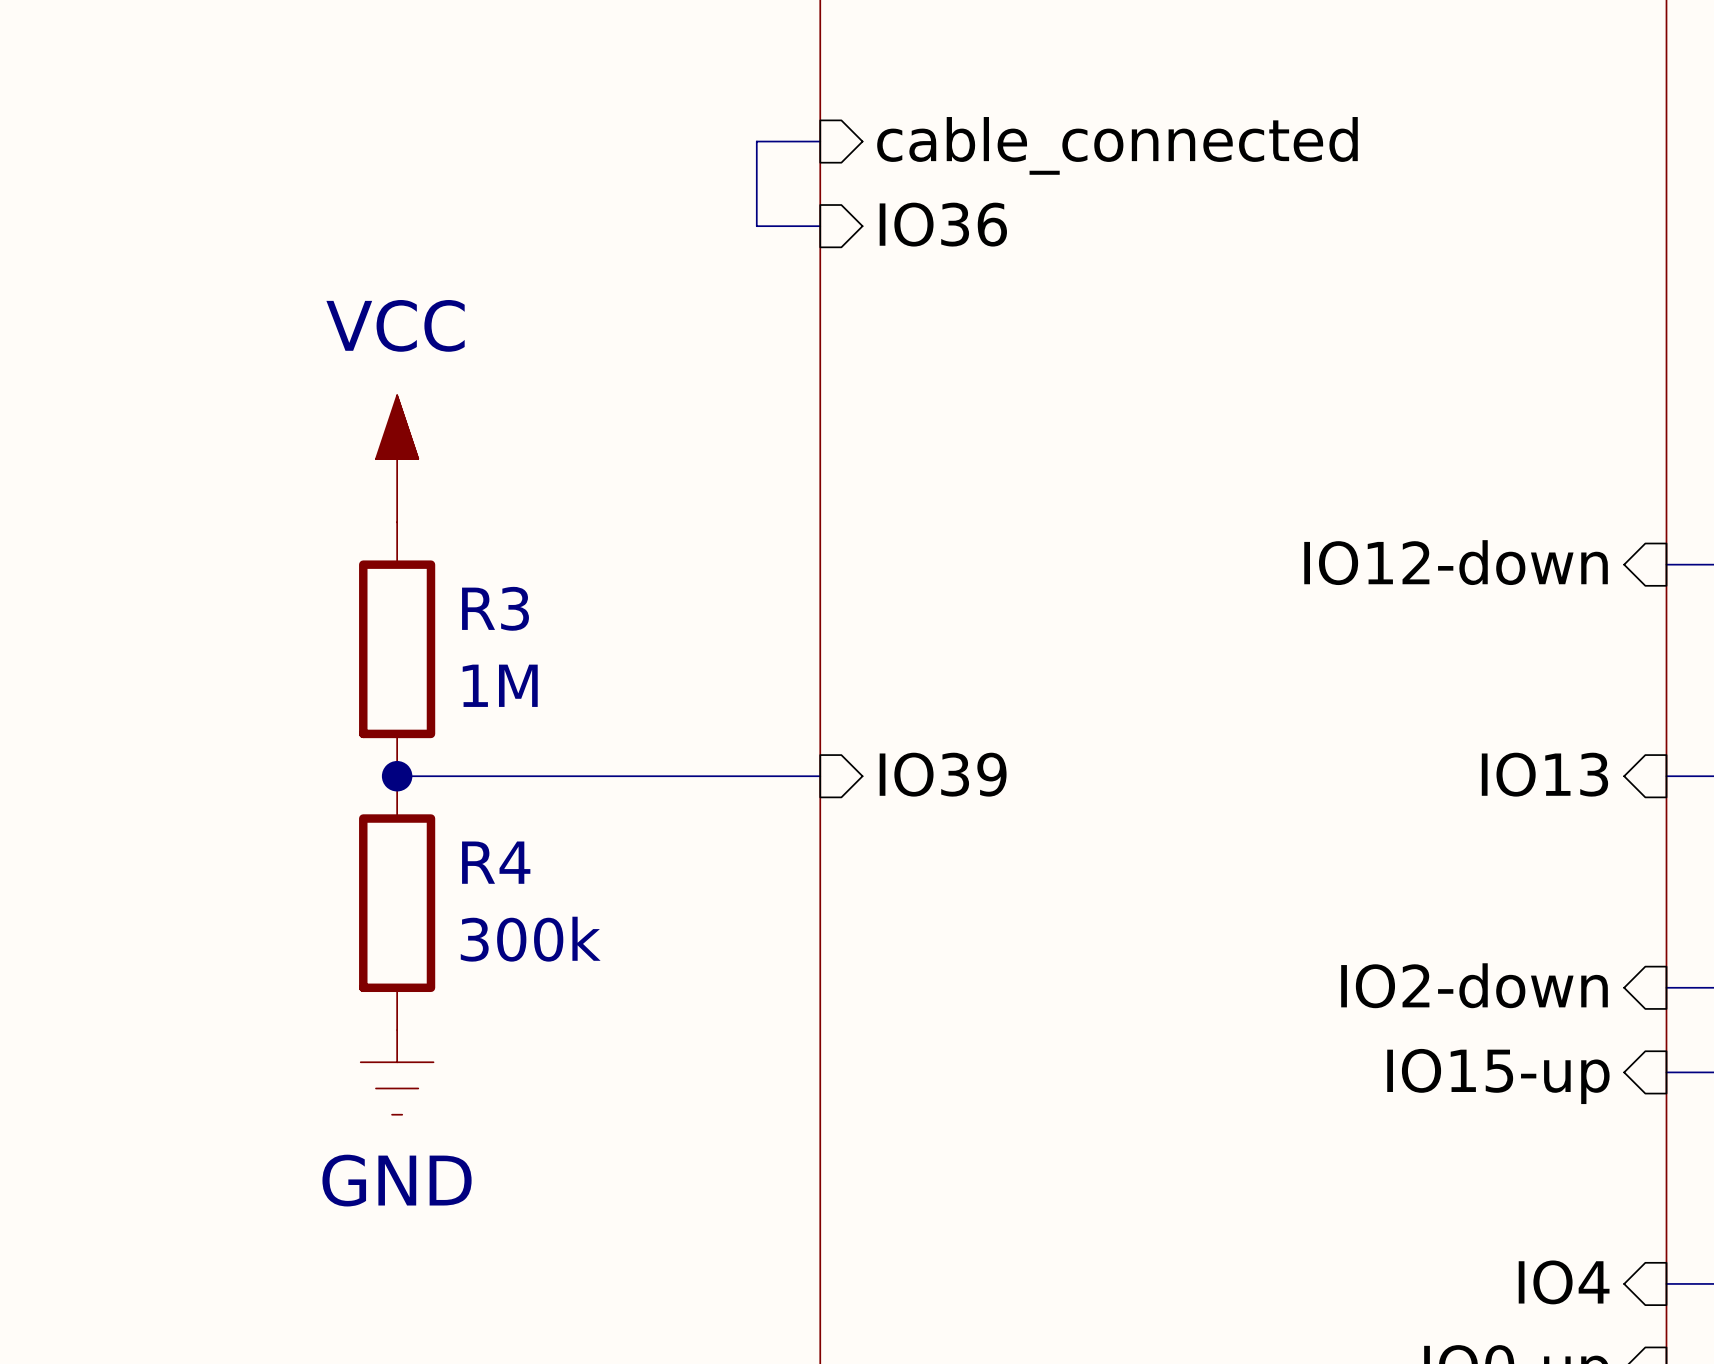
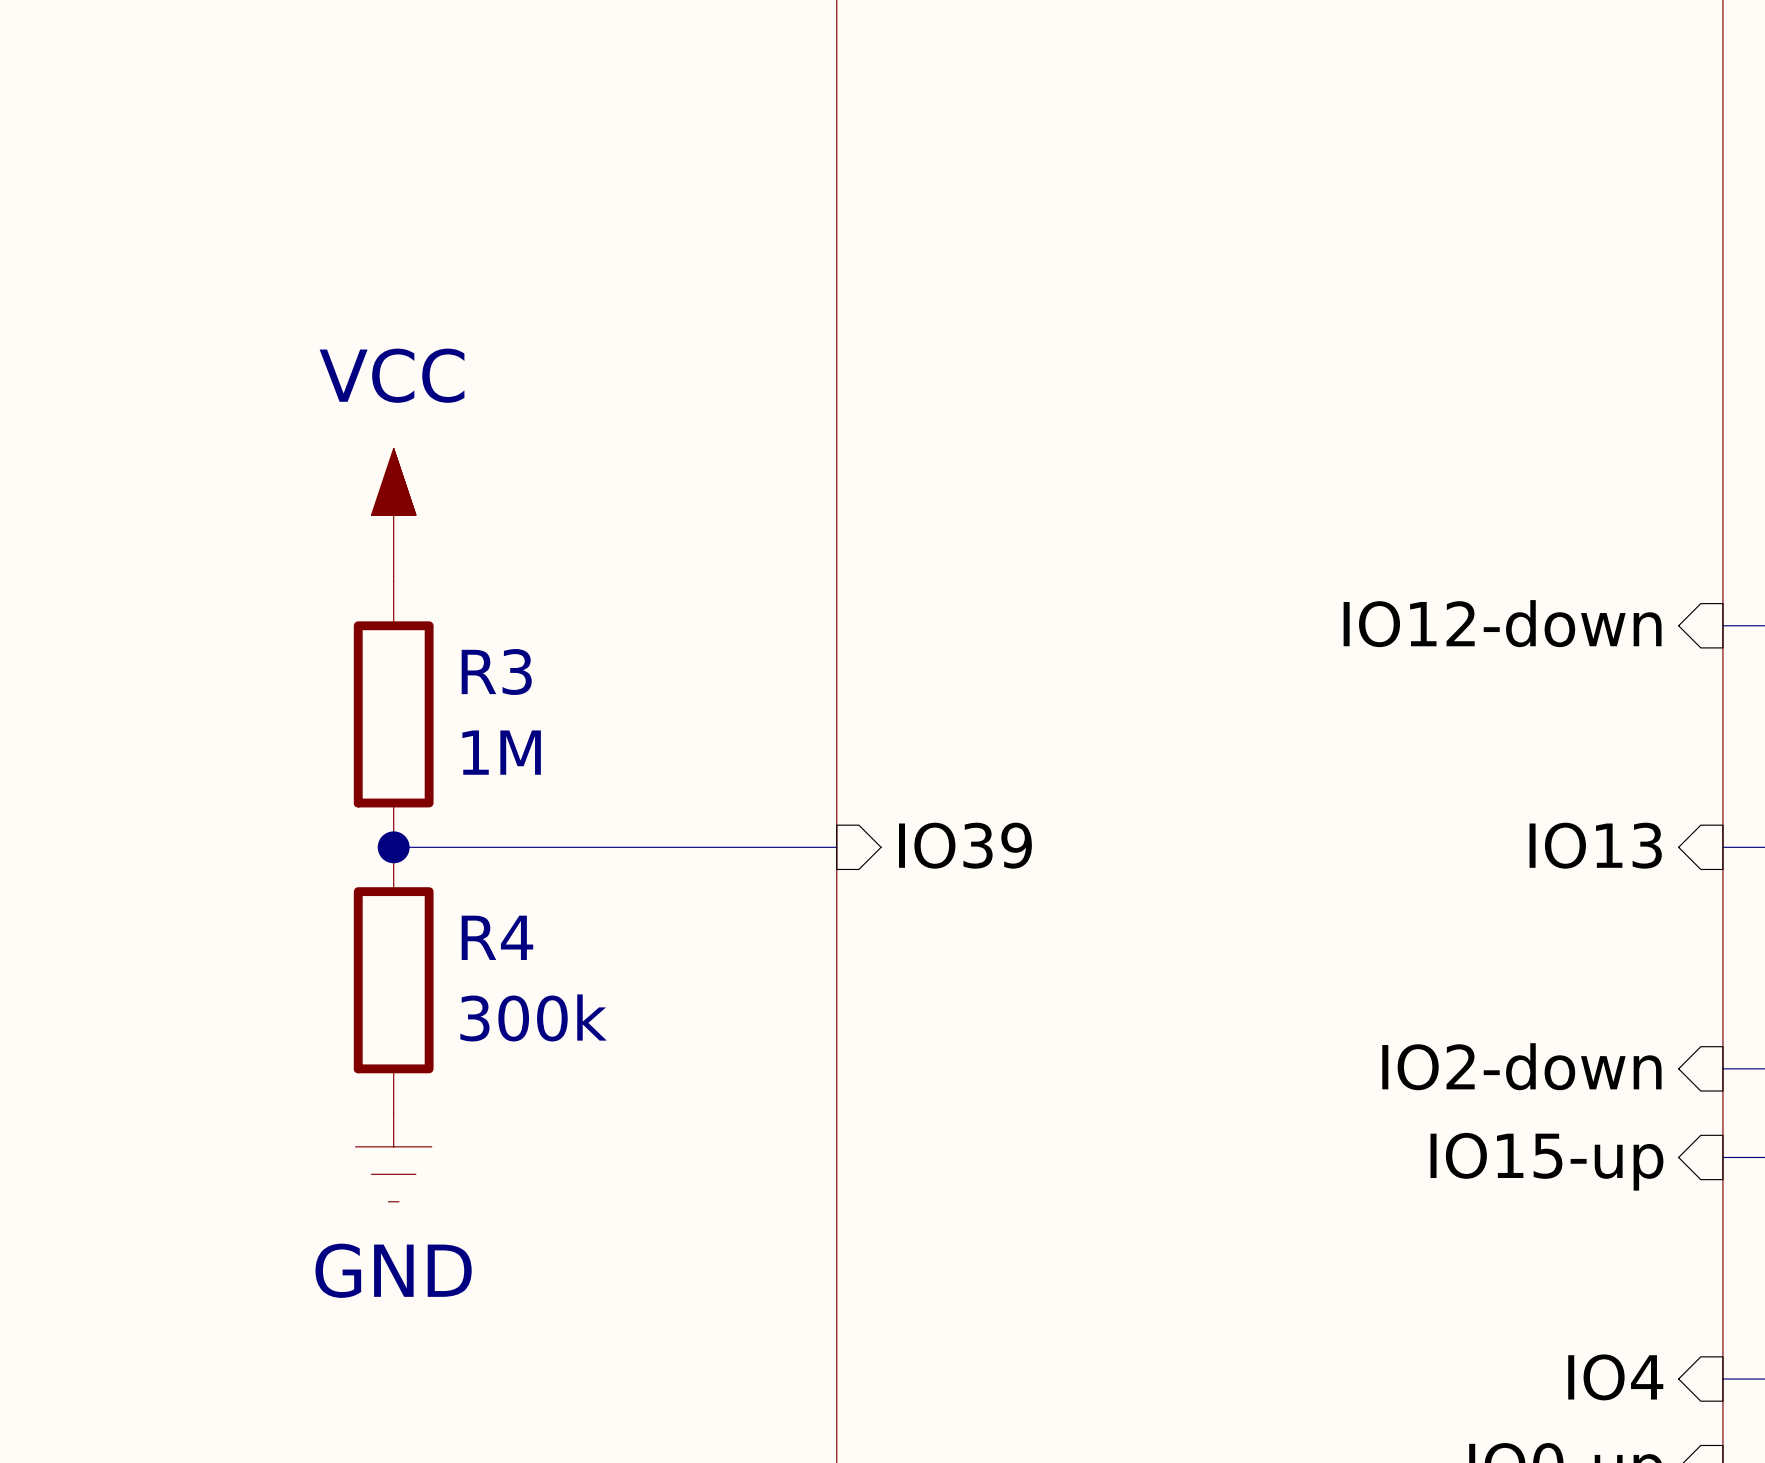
wire: (820, 141) (756, 141) (756, 226) (820, 226) -> none
sheet pin: cable_connected (1117, 145) -> none
sheet pin: IO36 (943, 224) -> none

